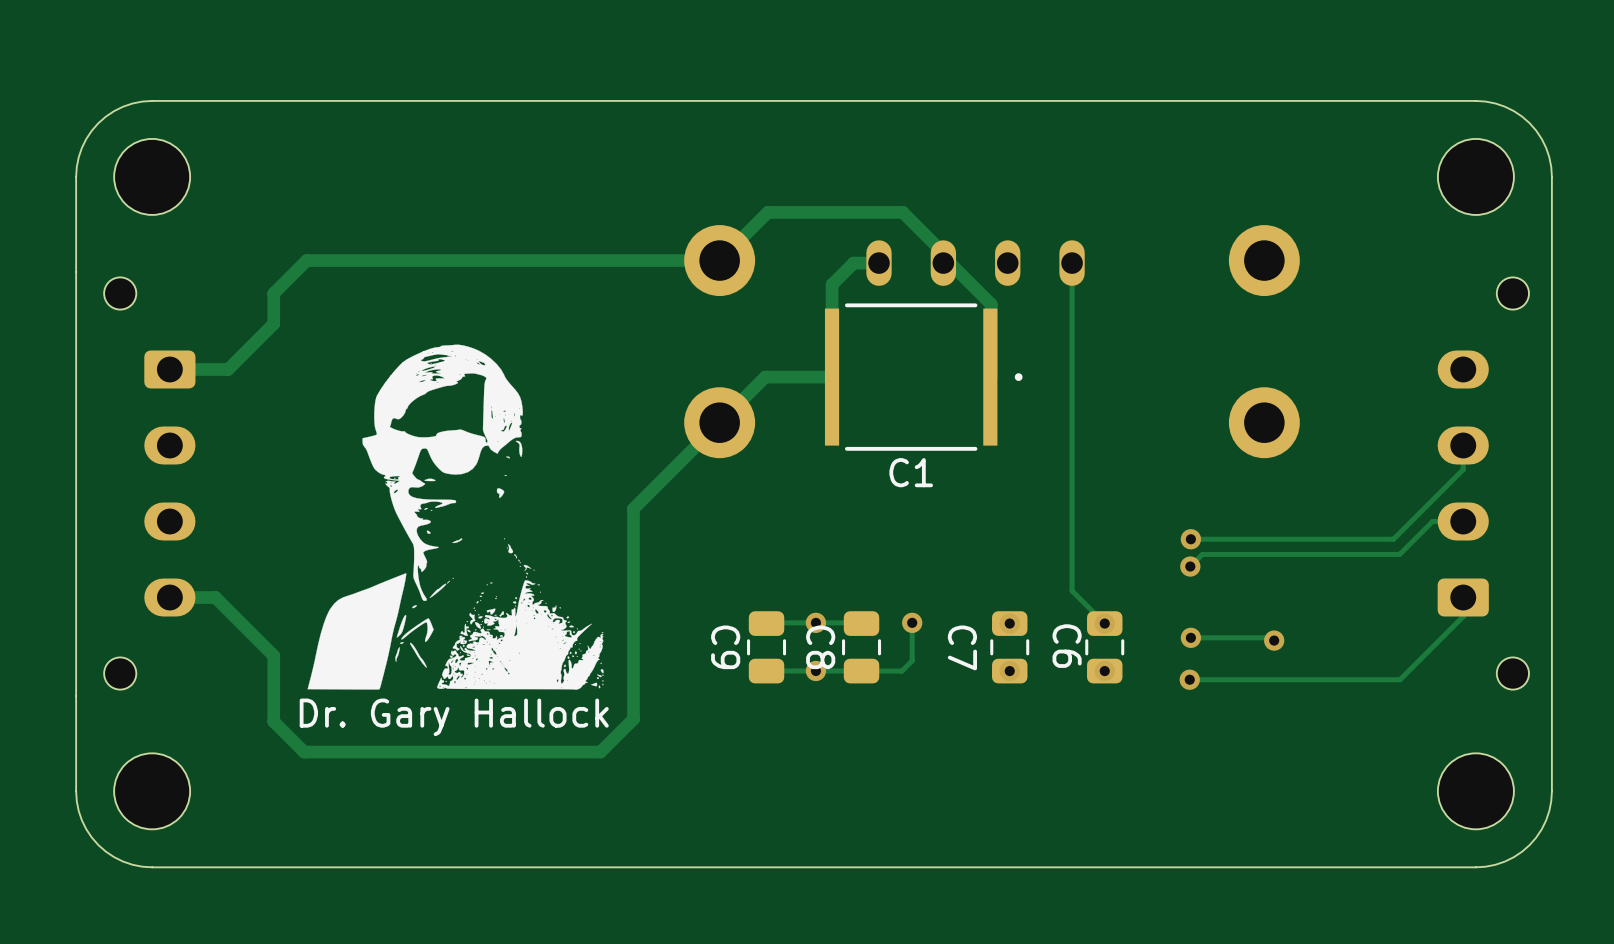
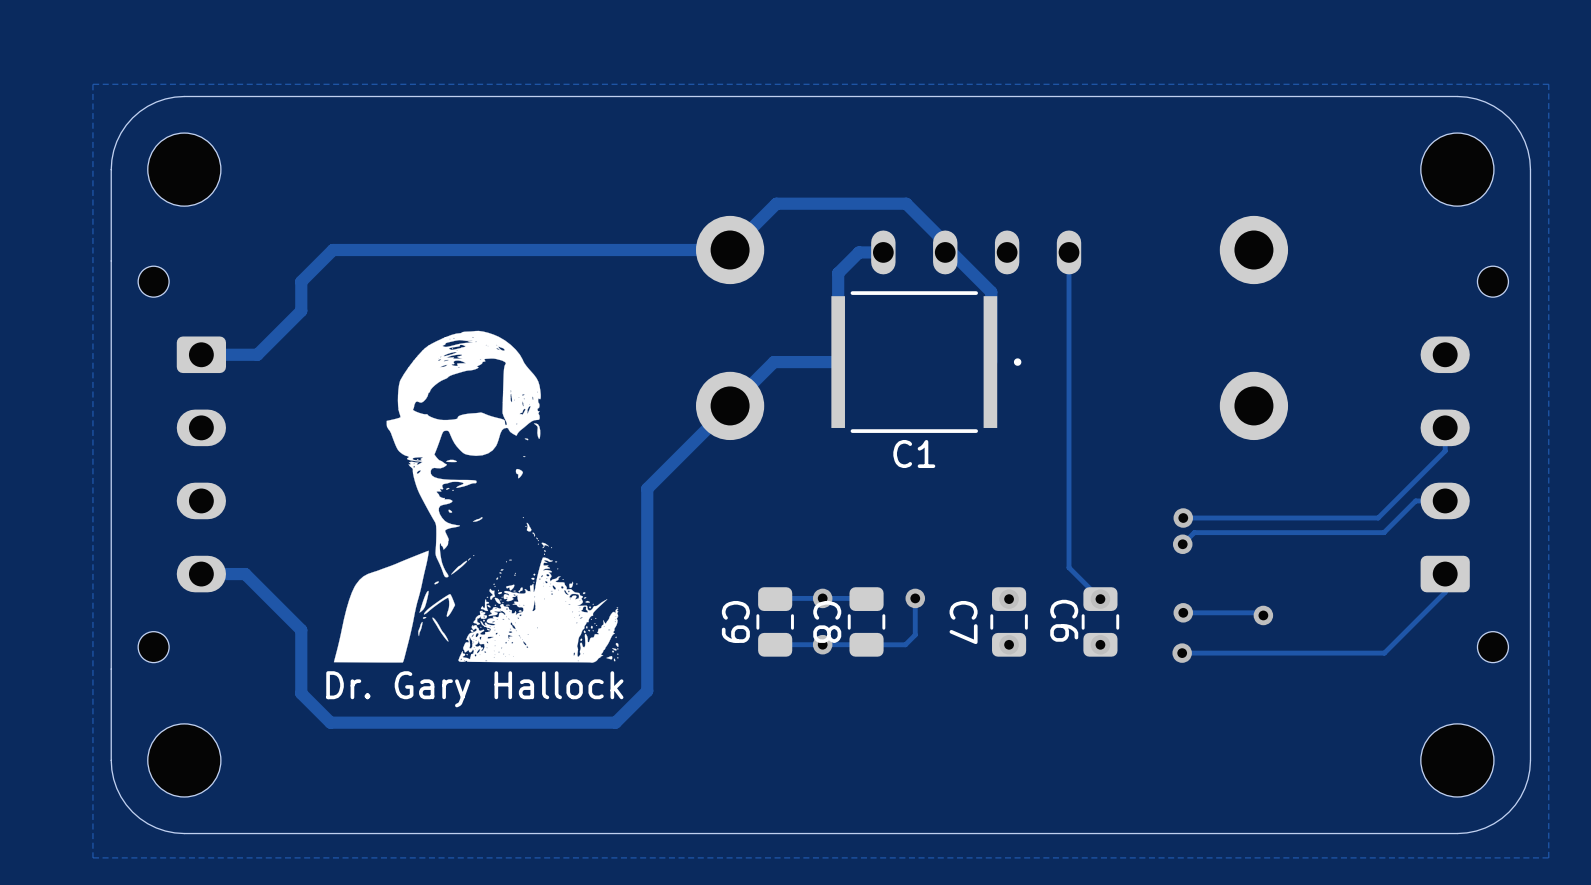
zone outline: none -> (1548, 84) (1548, 857) (92, 857) (92, 84) (1548, 84)

